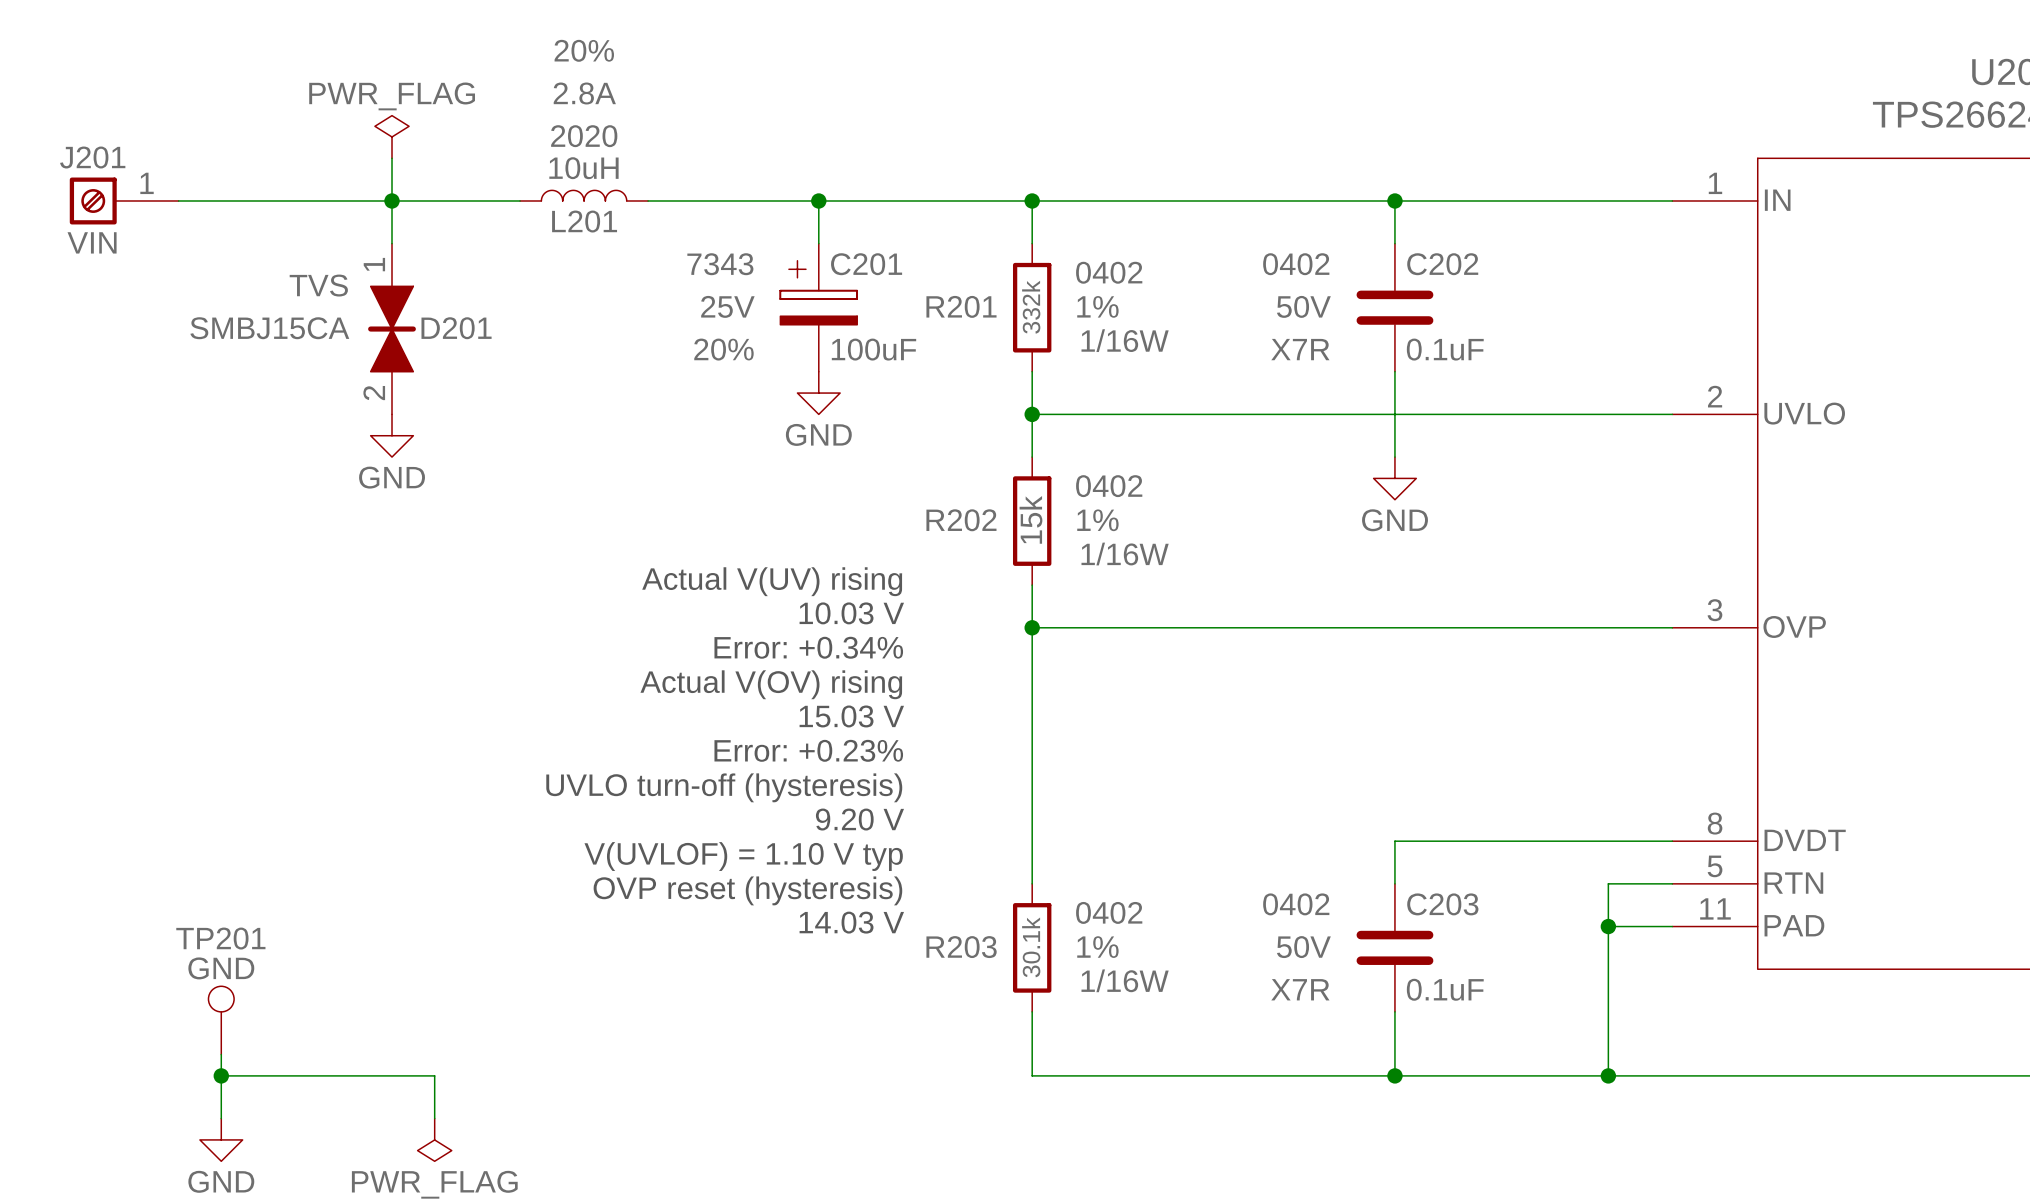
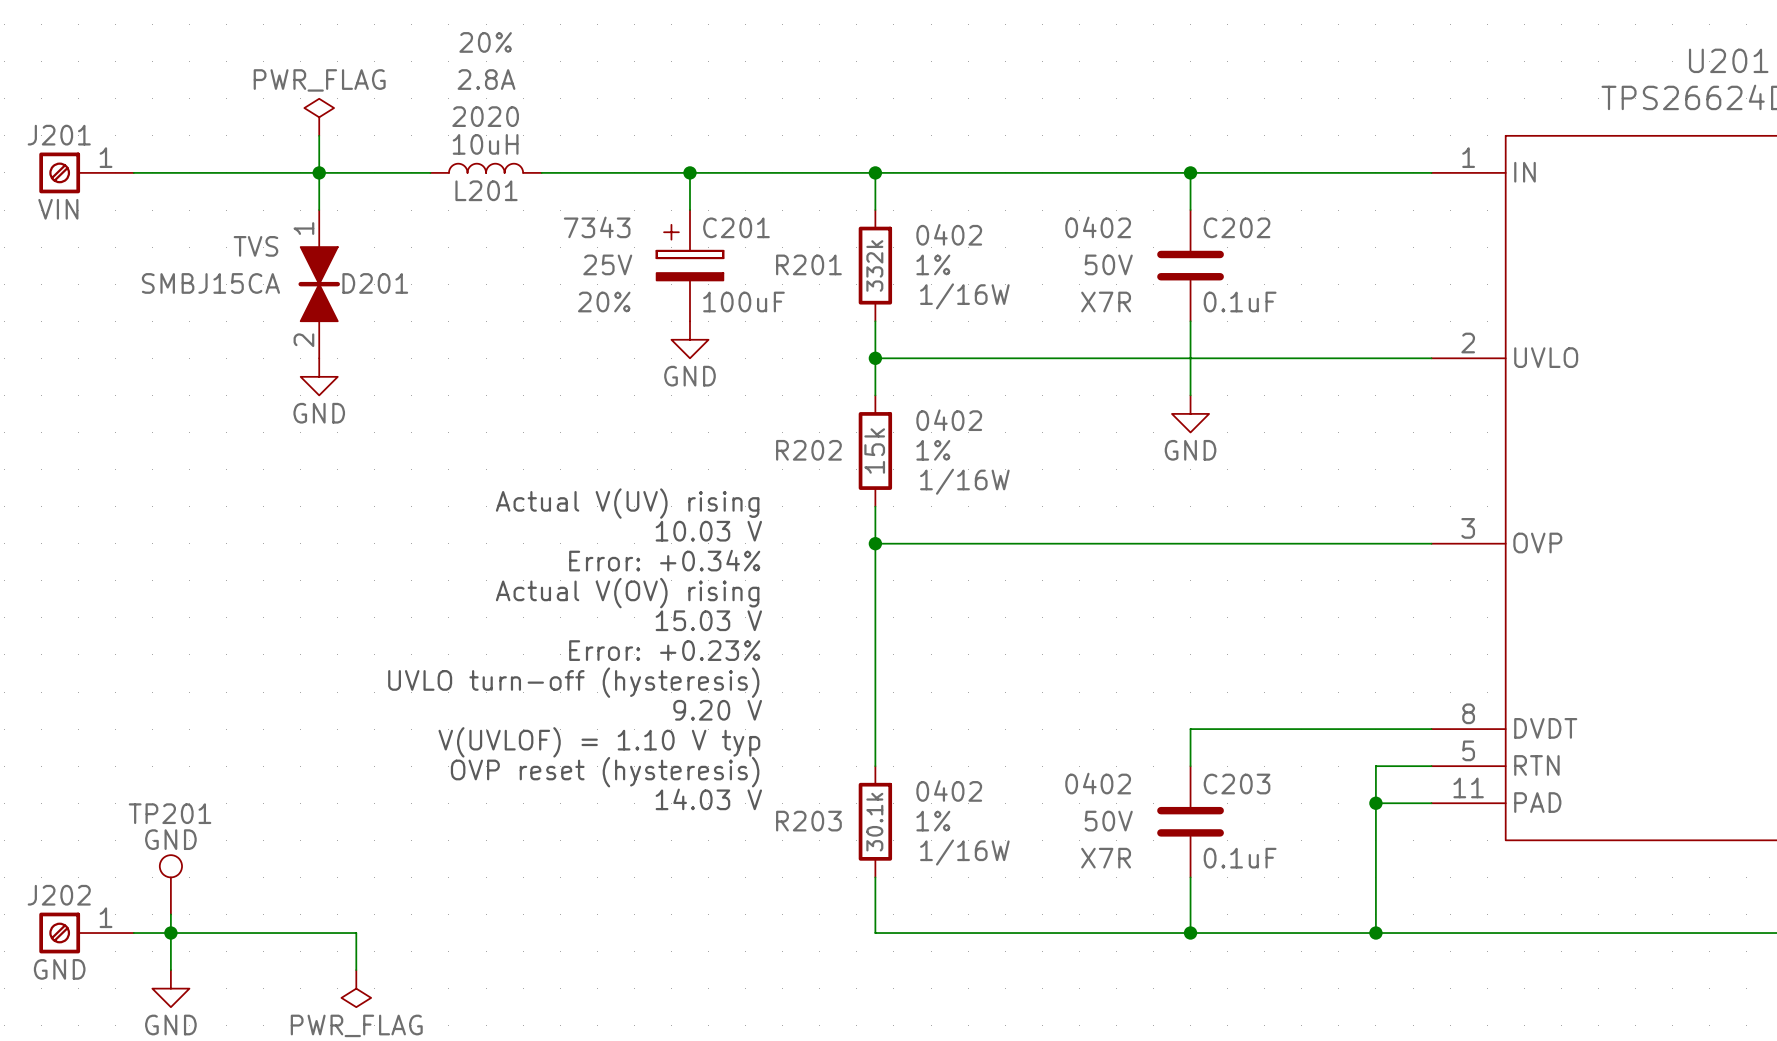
J202: none -> GND (86, 933)
wire: none -> (133, 933) (170, 933)

